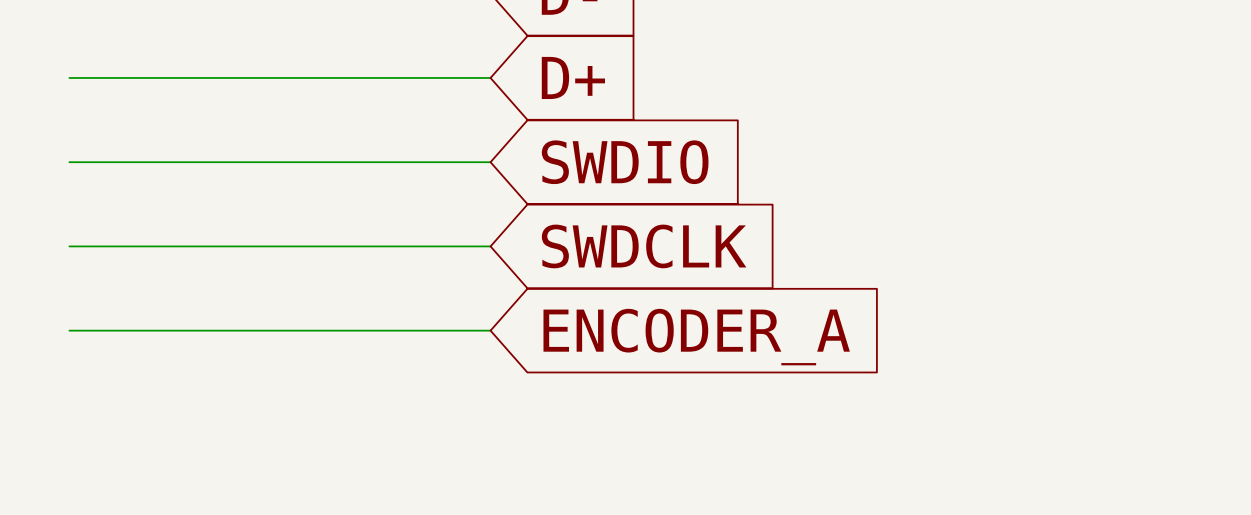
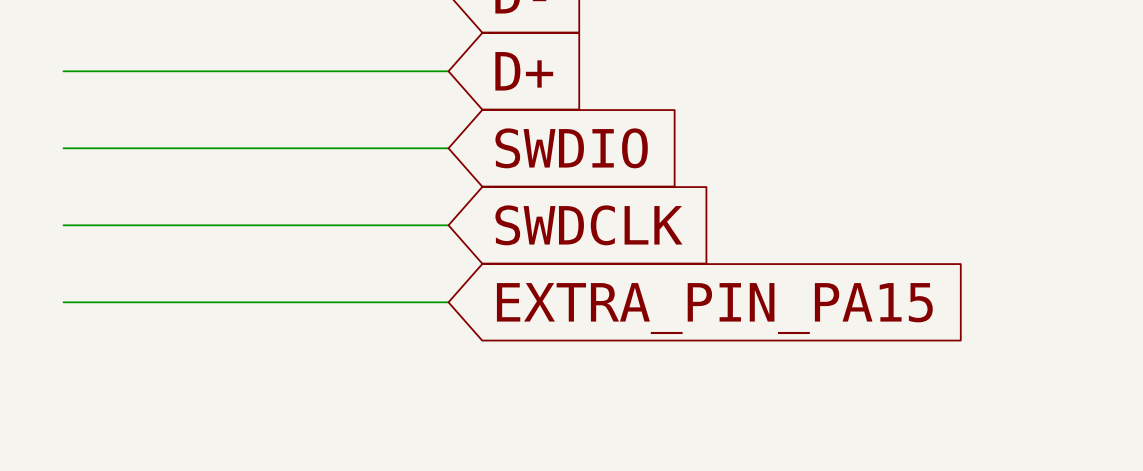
global label: ENCODER_A (696, 337) -> EXTRA_PIN_PA15 (714, 308)

